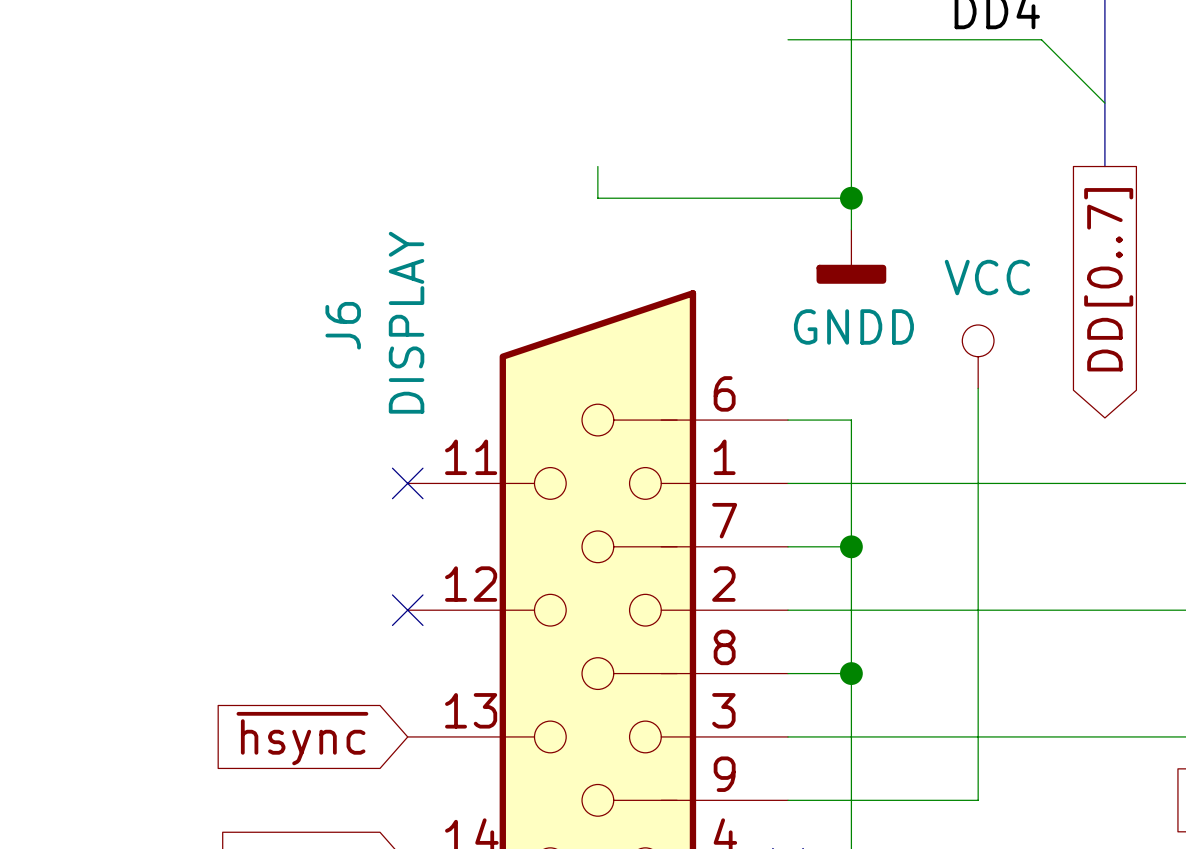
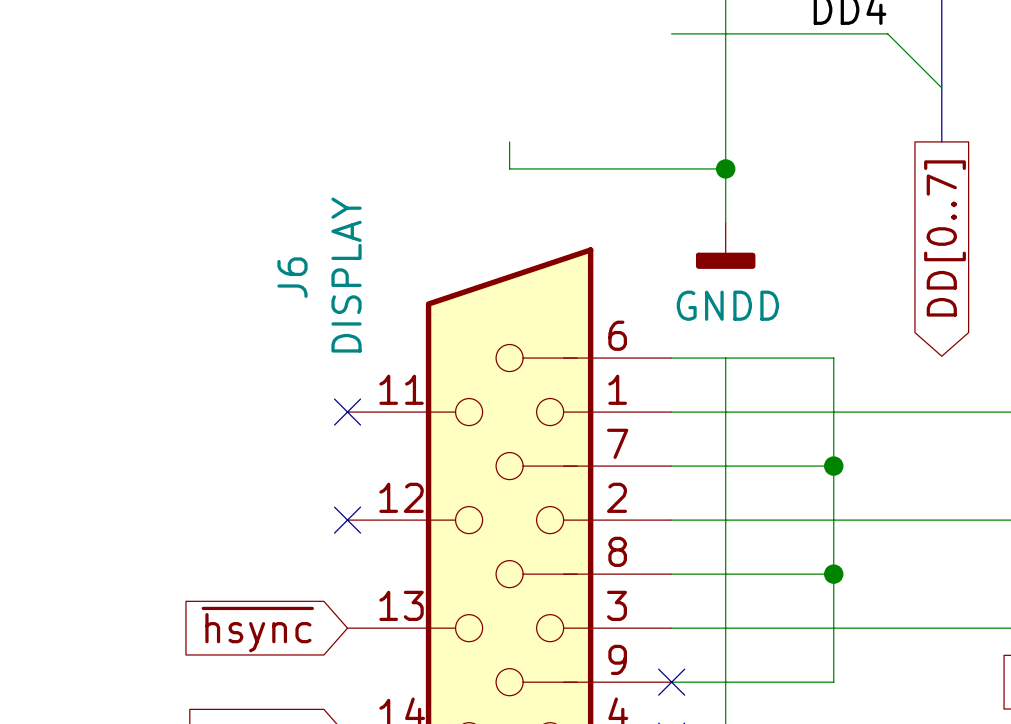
power symbol position: GNDD (851, 256) -> GNDD (725, 245)
power symbol: VCC (978, 356) -> none
wire: (978, 388) (978, 420) -> (725, 358) (833, 358)
wire: none -> (725, 466) (833, 466)
junction: (851, 546) -> none
junction: none -> (833, 466)
wire: none -> (725, 574) (833, 574)
junction: (851, 673) -> none
junction: none -> (833, 574)
no-connect mark: none -> (671, 682)

